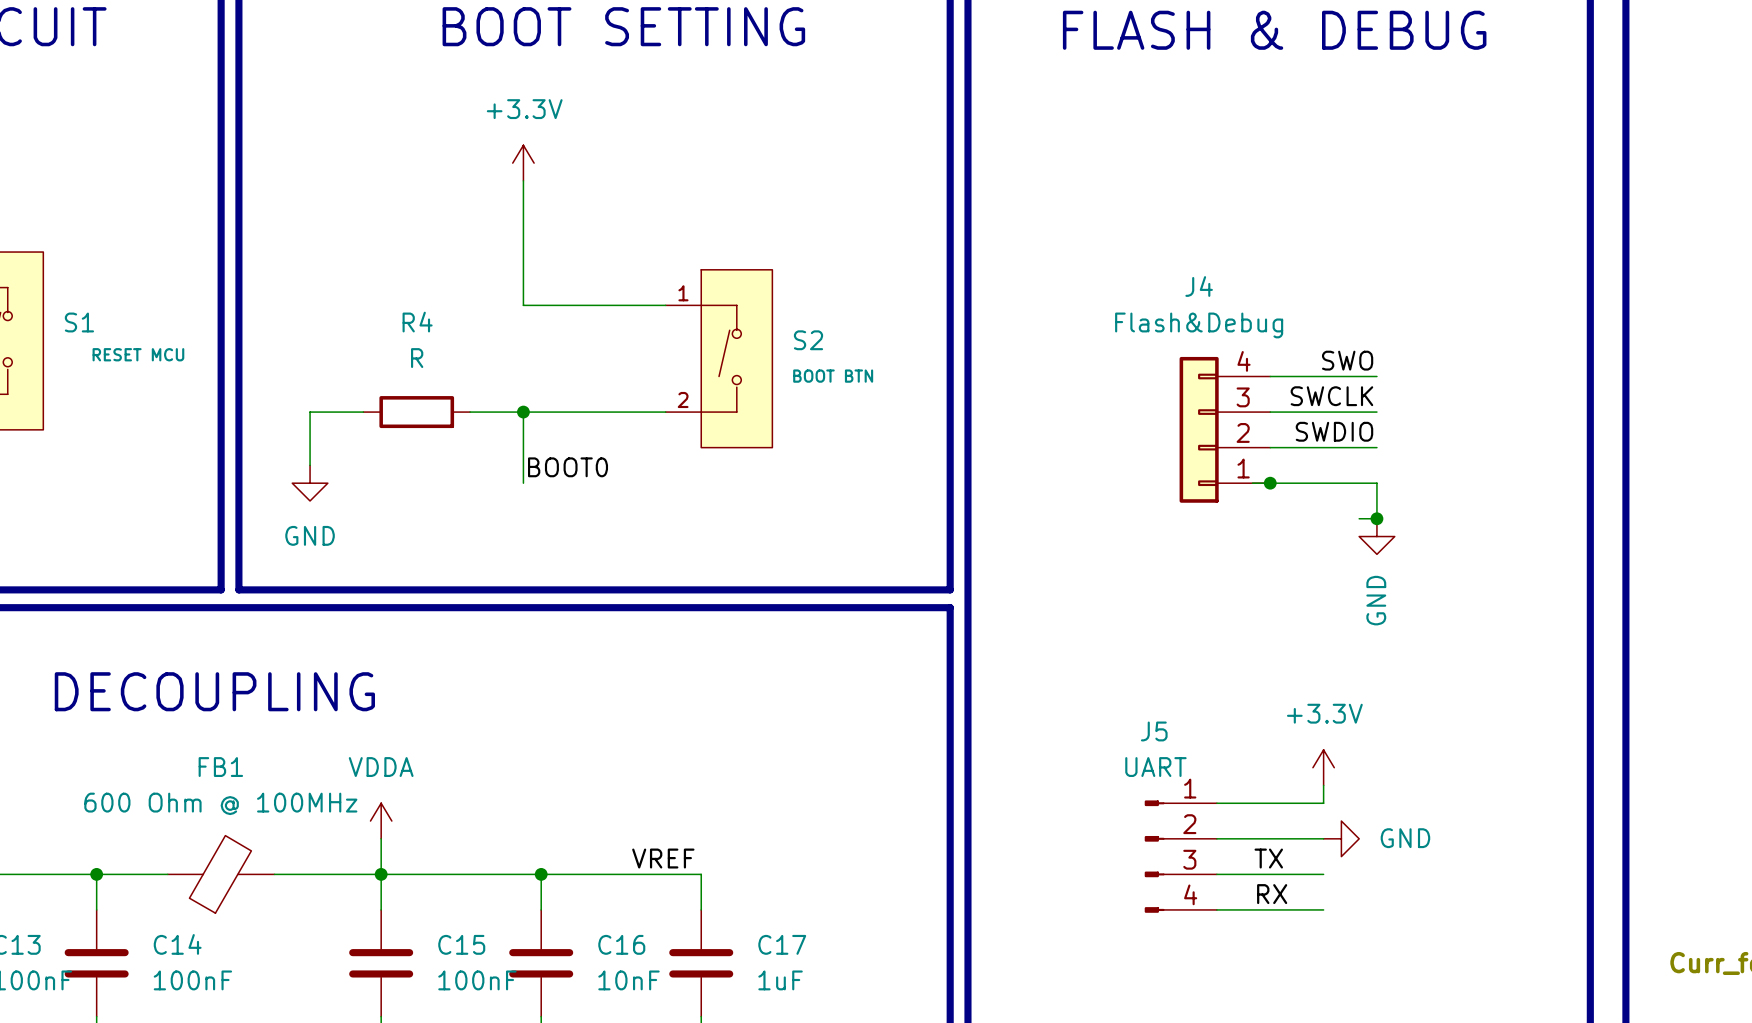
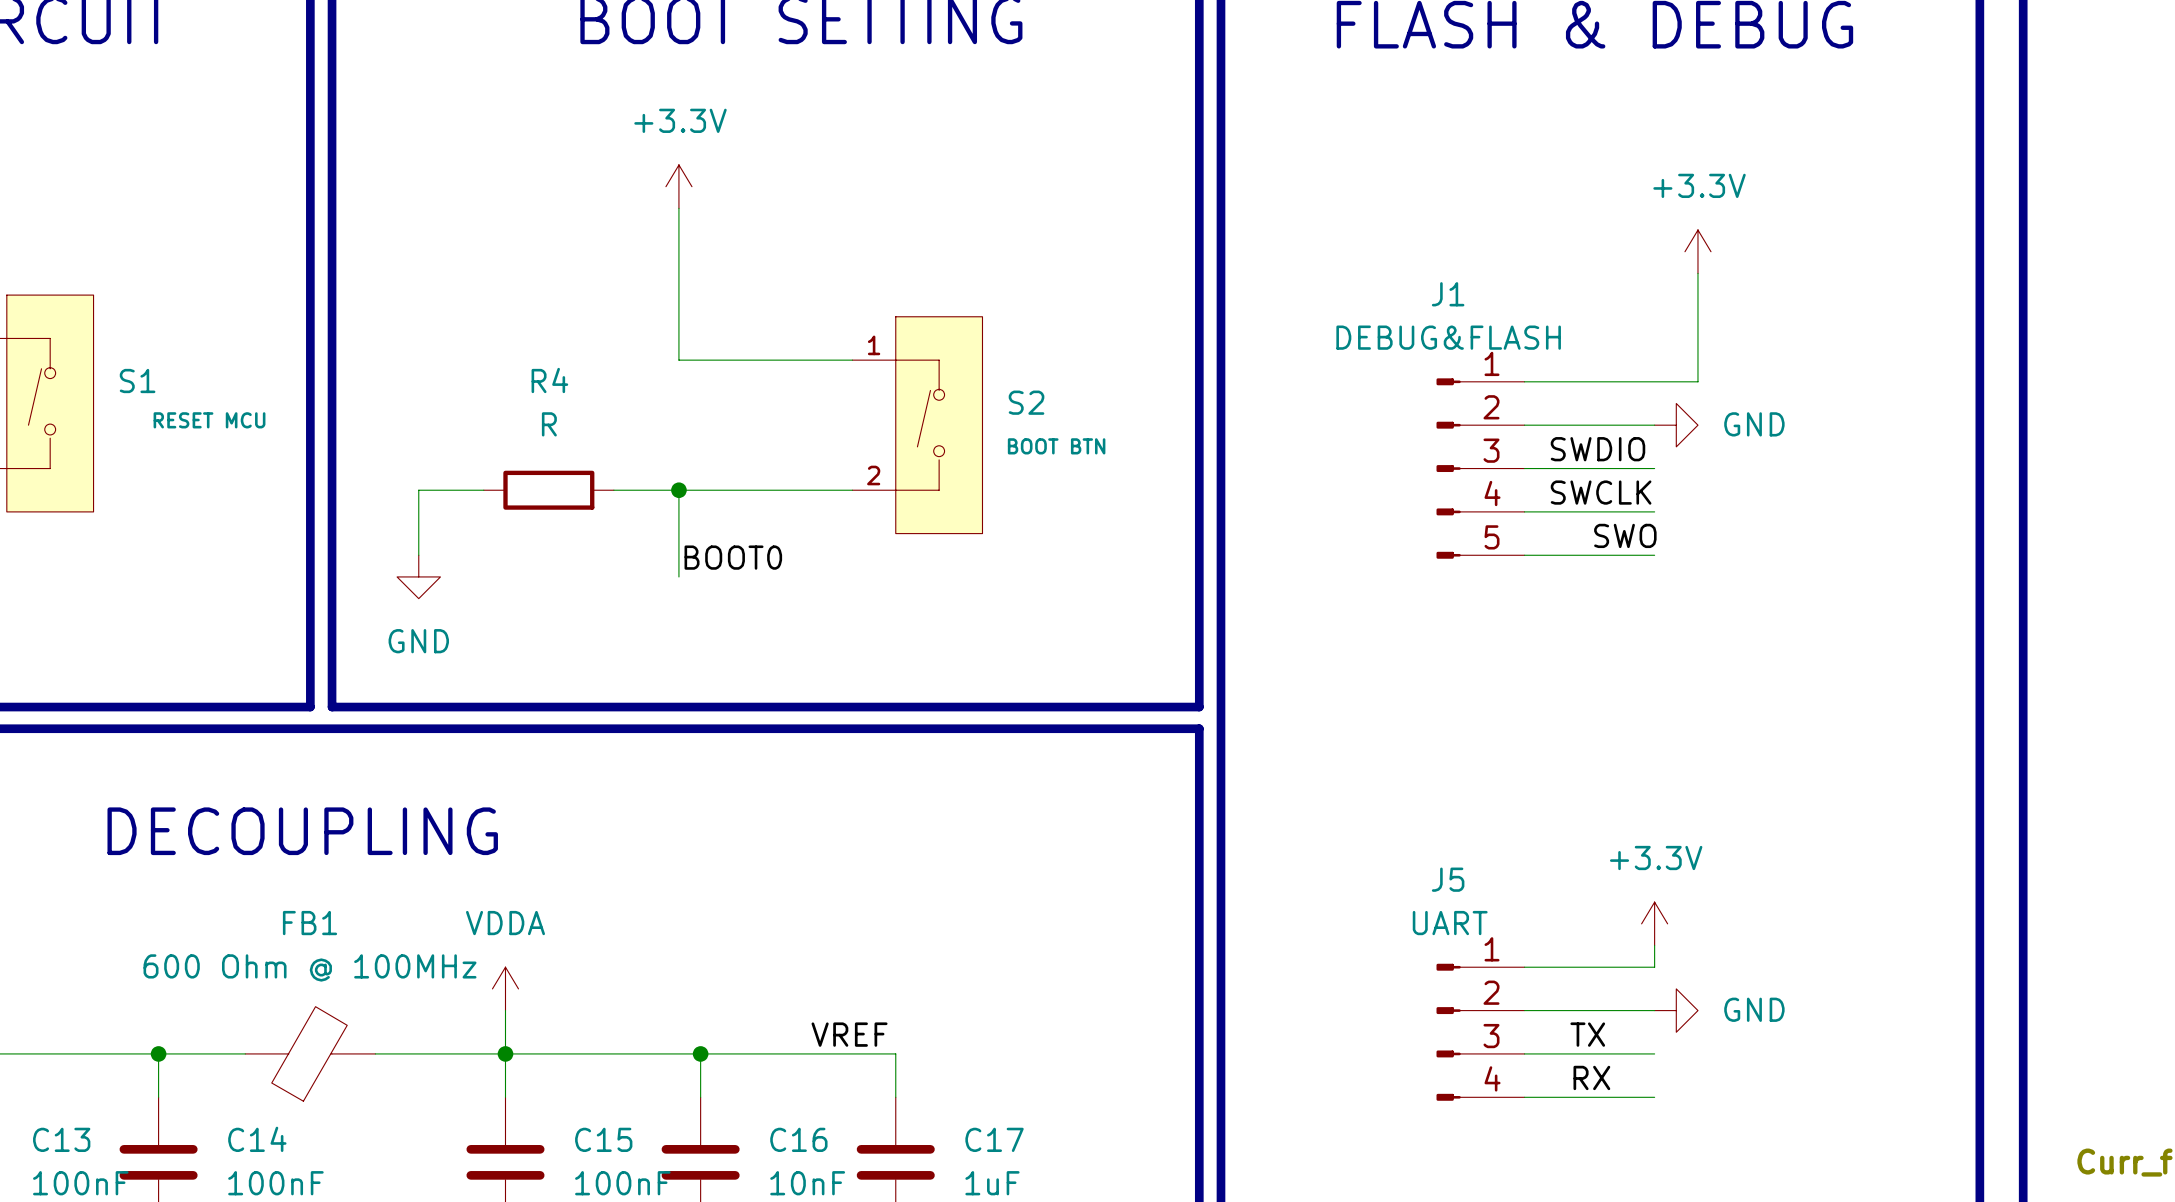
power symbol: none -> +3.3V (1697, 251)
wire: none -> (1697, 273) (1697, 381) (1524, 381)
wire: none -> (1524, 425) (1654, 425)
label position: SWO (1347, 360) -> SWO (1625, 535)
wire: (1270, 376) (1376, 376) -> (1524, 468) (1654, 468)
J1: none -> DEBUG&FLASH (1480, 468)
label position: SWCLK (1331, 396) -> SWCLK (1601, 492)
wire: (1270, 412) (1376, 412) -> (1524, 511) (1654, 511)
J4: Flash&Debug (1224, 429) -> none
label position: SWDIO (1334, 431) -> SWDIO (1598, 449)
wire: (1270, 447) (1376, 447) -> (1524, 555) (1654, 555)
wire: (1252, 483) (1376, 483) (1376, 518) (1359, 518) -> none
junction: (1270, 483) -> none
junction: (1376, 518) -> none
power symbol rotation: 0° (1376, 536) -> 90° counterclockwise (1676, 425)
power symbol position: GND (1376, 536) -> GND (1676, 425)

